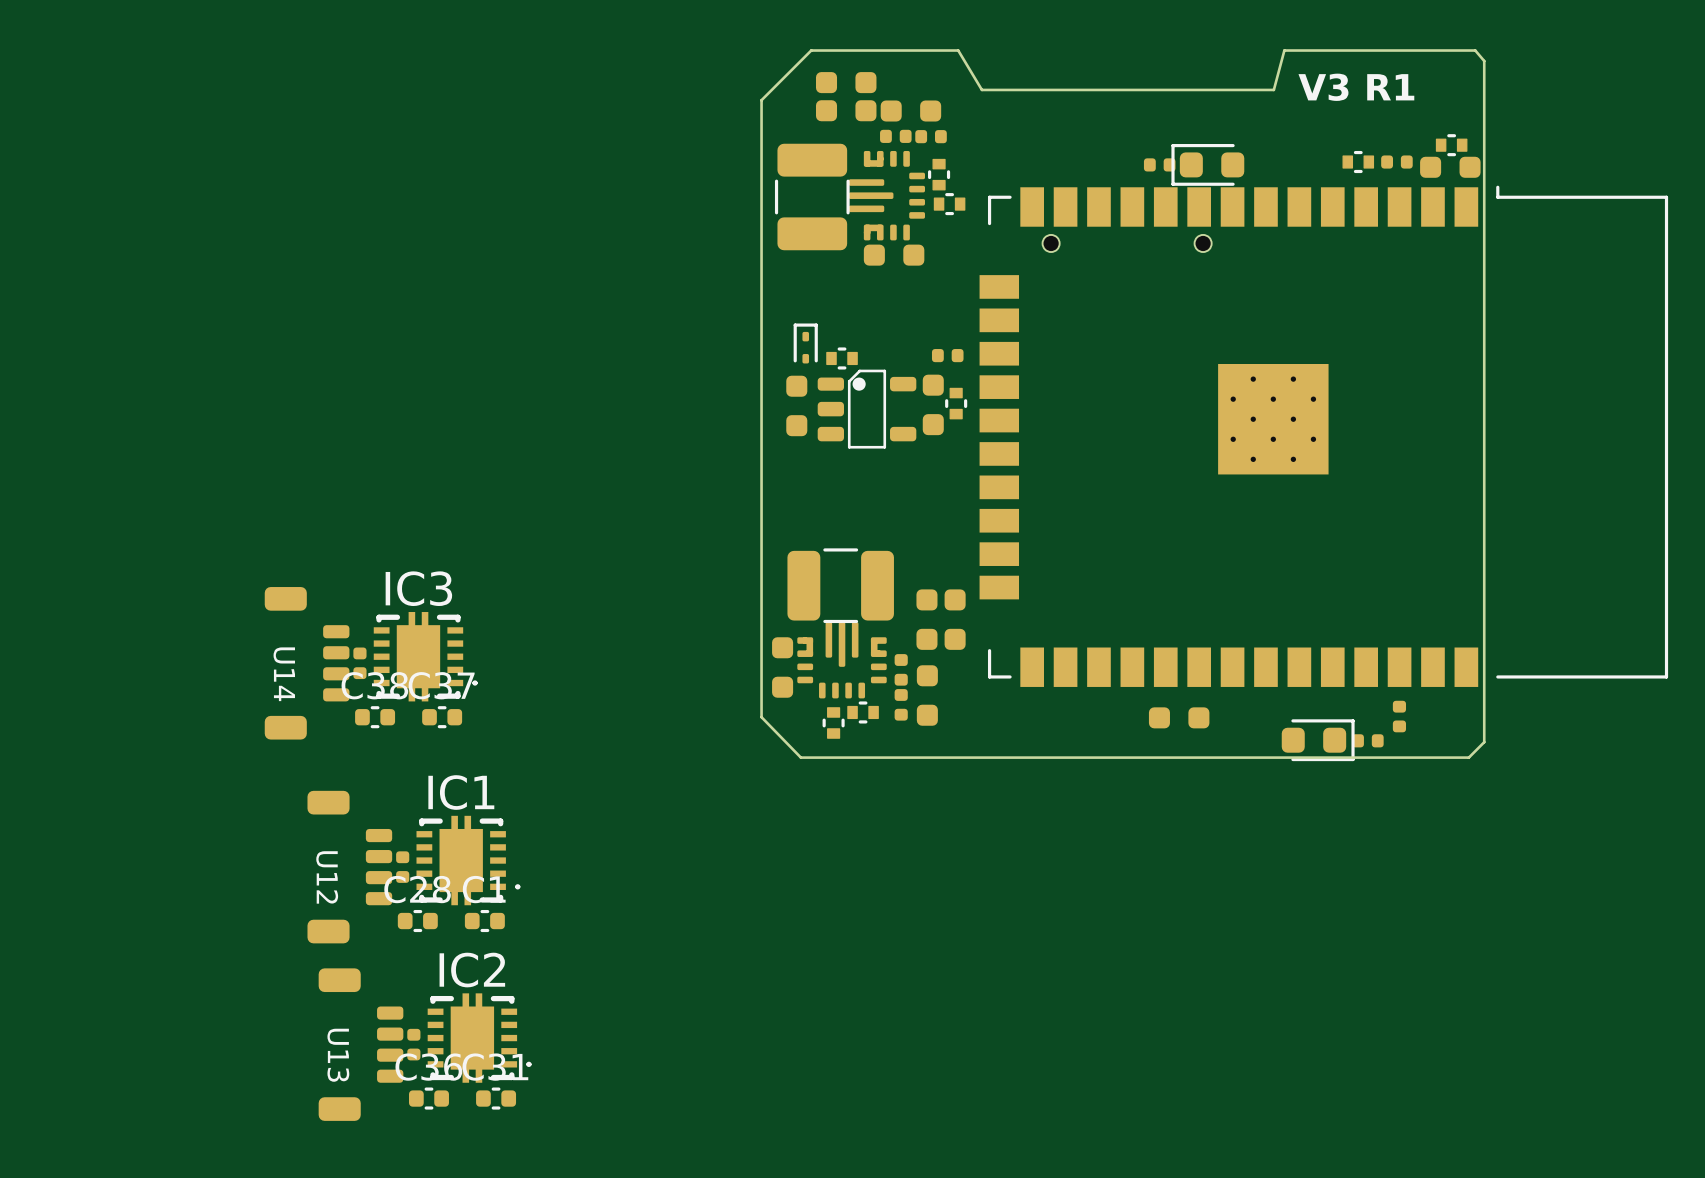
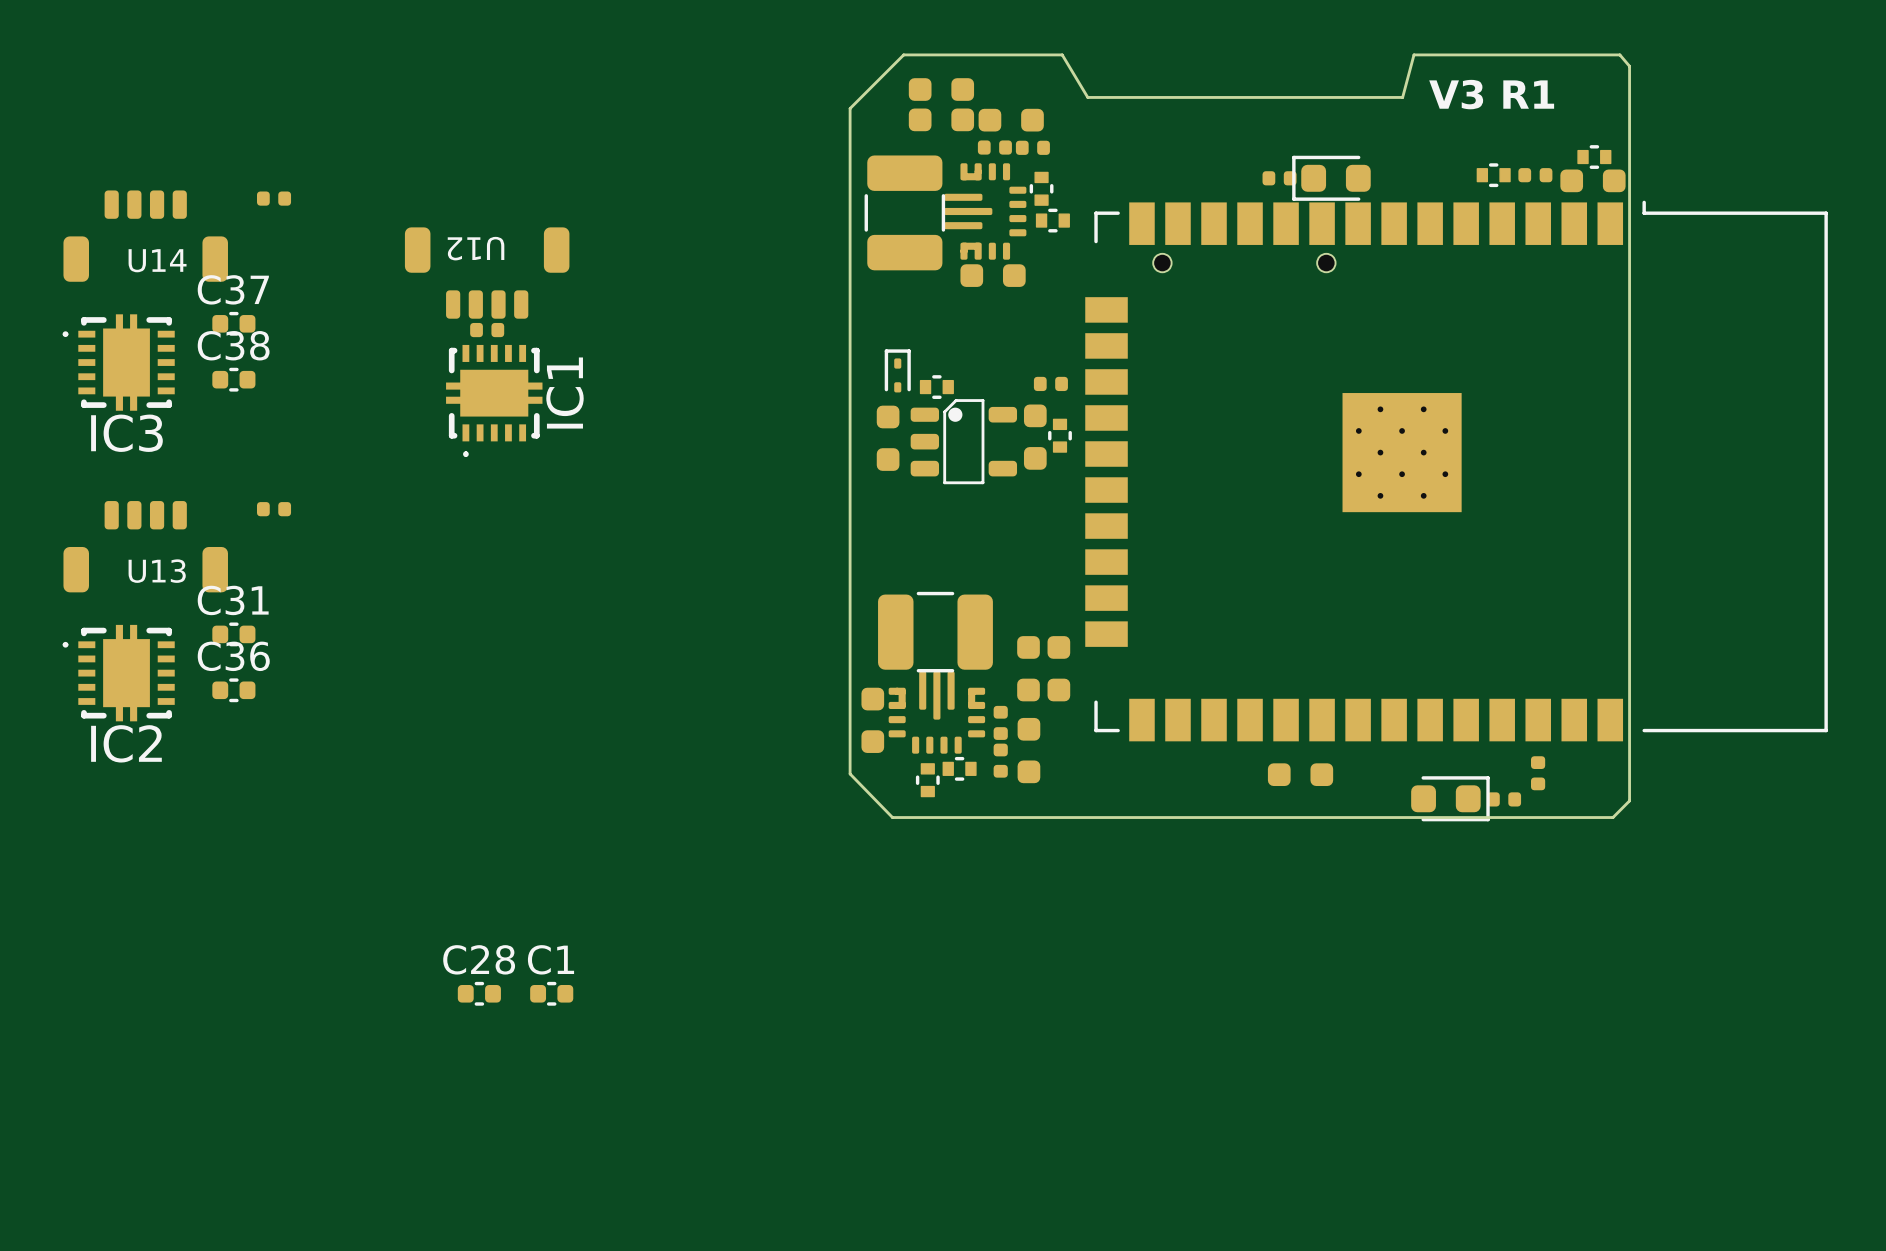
part: none -> (274, 198)
part: none -> (487, 330)
part: none -> (274, 509)
IC3 rotation: 0° (425, 656) -> 180° (118, 362)
IC3 position: (425, 656) -> (118, 362)
U14 rotation: 0° (307, 663) -> 90° counterclockwise (145, 236)
U14 position: (307, 663) -> (145, 236)
part: (359, 663) -> none
C38 position: (375, 717) -> (233, 379)
C37 position: (442, 717) -> (233, 323)
IC1 rotation: 0° (468, 860) -> 90° clockwise (494, 400)
IC1 position: (468, 860) -> (494, 400)
U12 rotation: 0° (349, 867) -> 90° clockwise (487, 273)
U12 position: (349, 867) -> (487, 273)
part: (402, 867) -> none
IC2 rotation: 0° (479, 1038) -> 180° (118, 673)
IC2 position: (479, 1038) -> (118, 673)
U13 rotation: 0° (361, 1044) -> 90° counterclockwise (145, 546)
U13 position: (361, 1044) -> (145, 546)
part: (413, 1044) -> none
C36 position: (428, 1098) -> (233, 690)
C31 position: (496, 1098) -> (233, 634)

